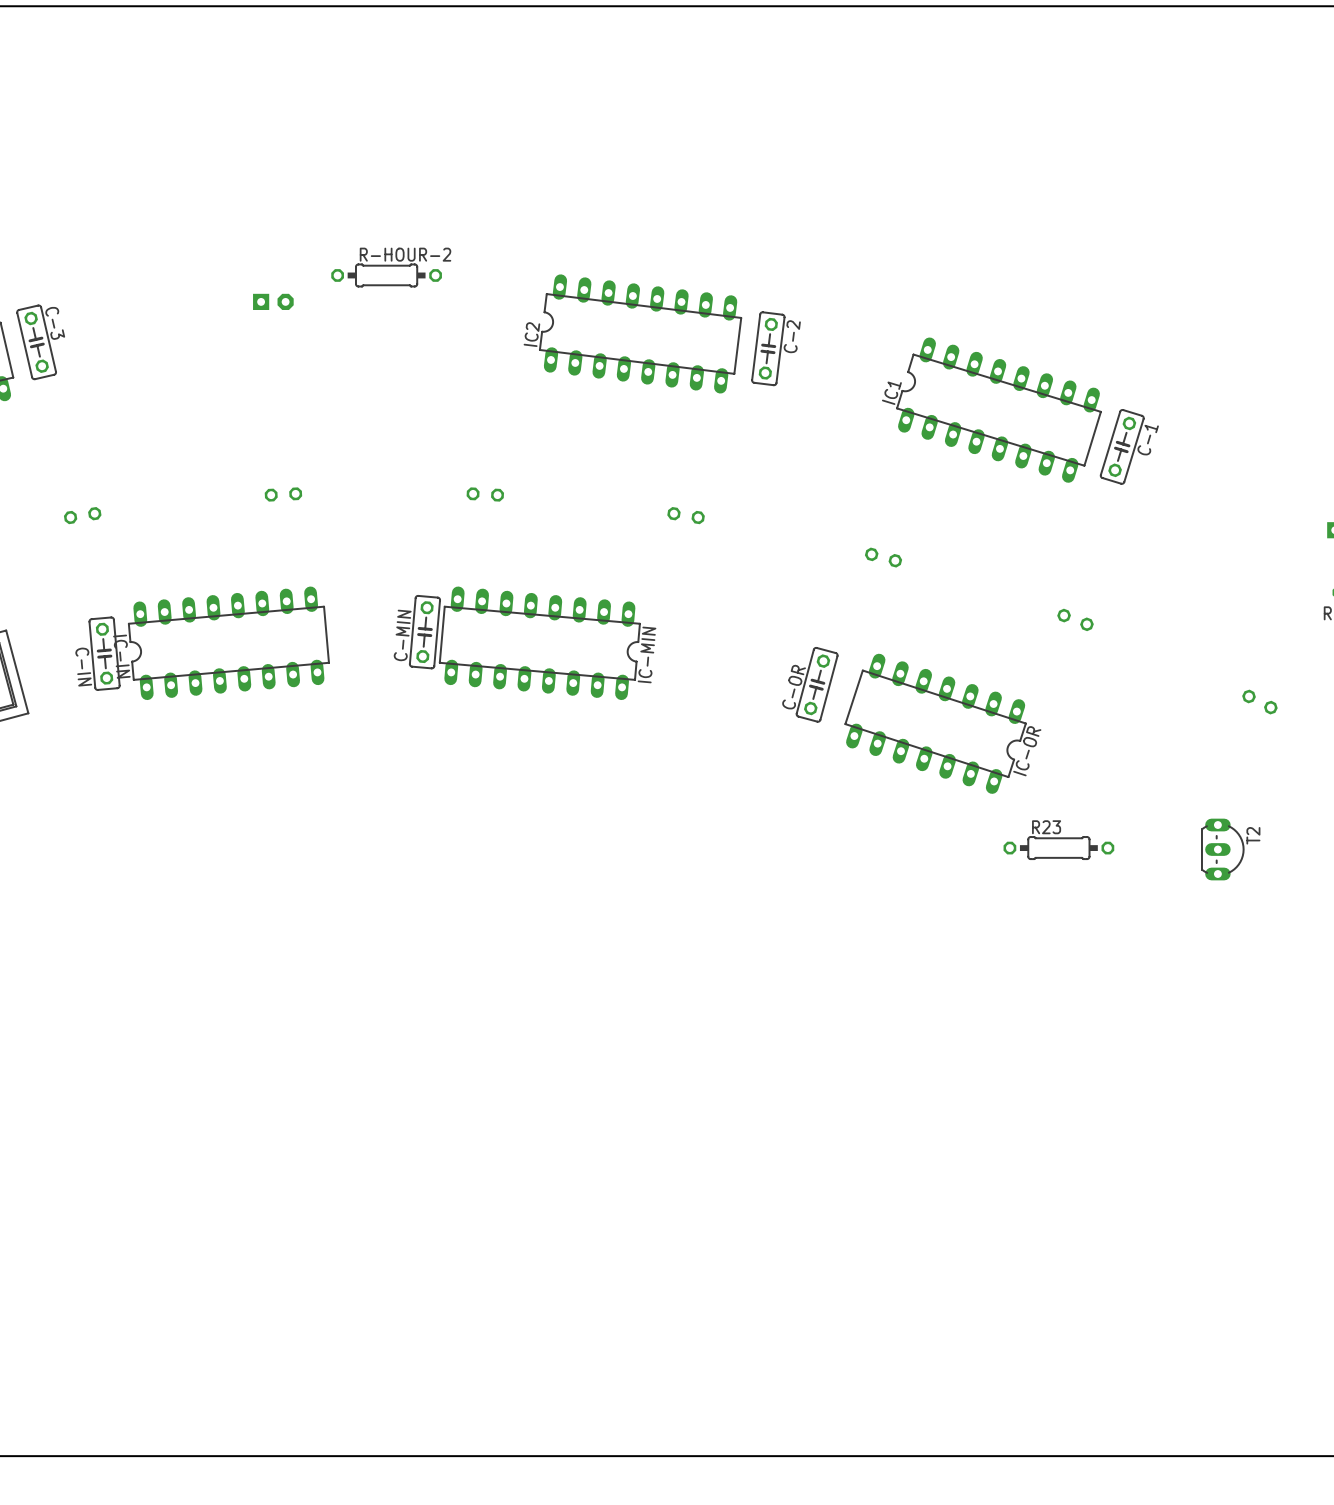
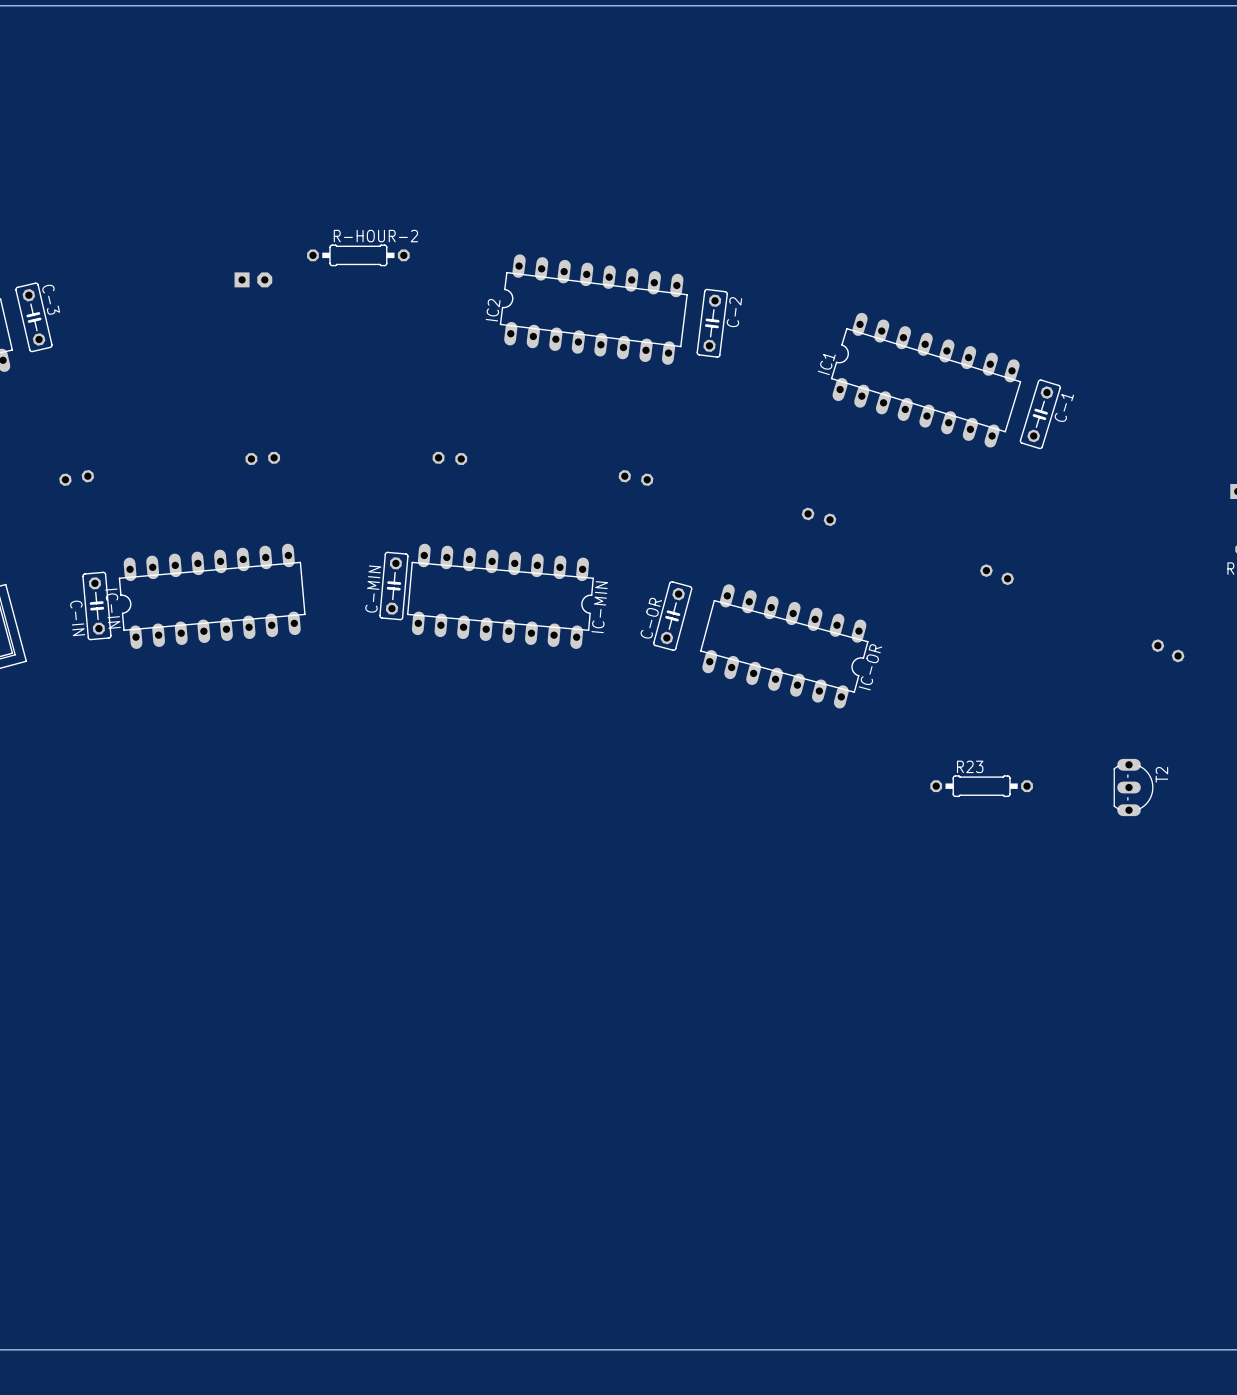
C-OR position: (817, 684) -> (672, 616)
IC-OR: none -> (784, 646)
IC-OR: (935, 723) -> none

